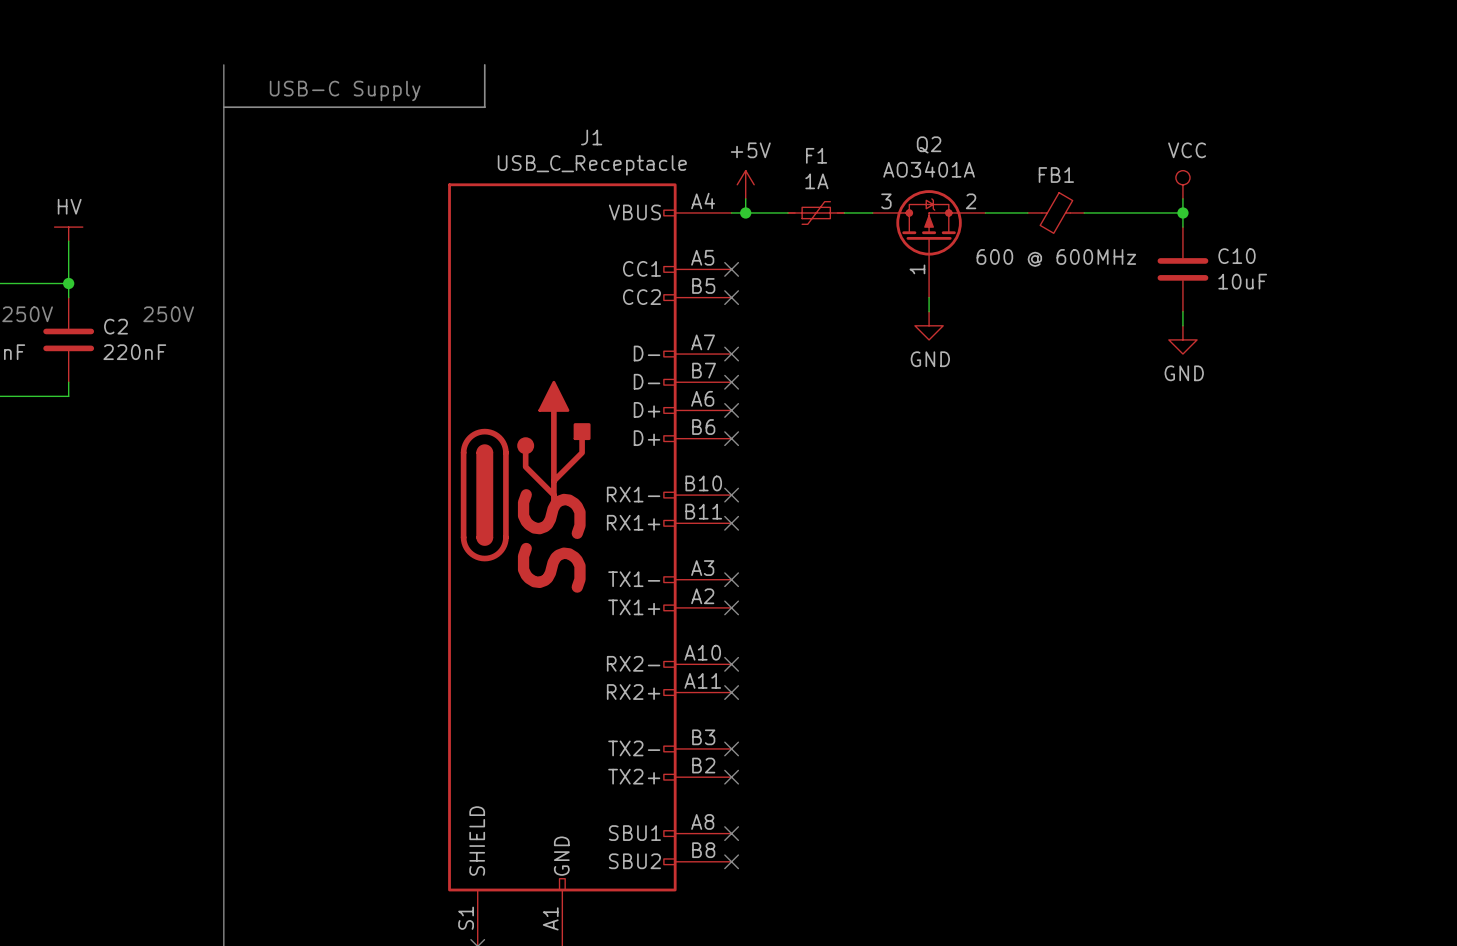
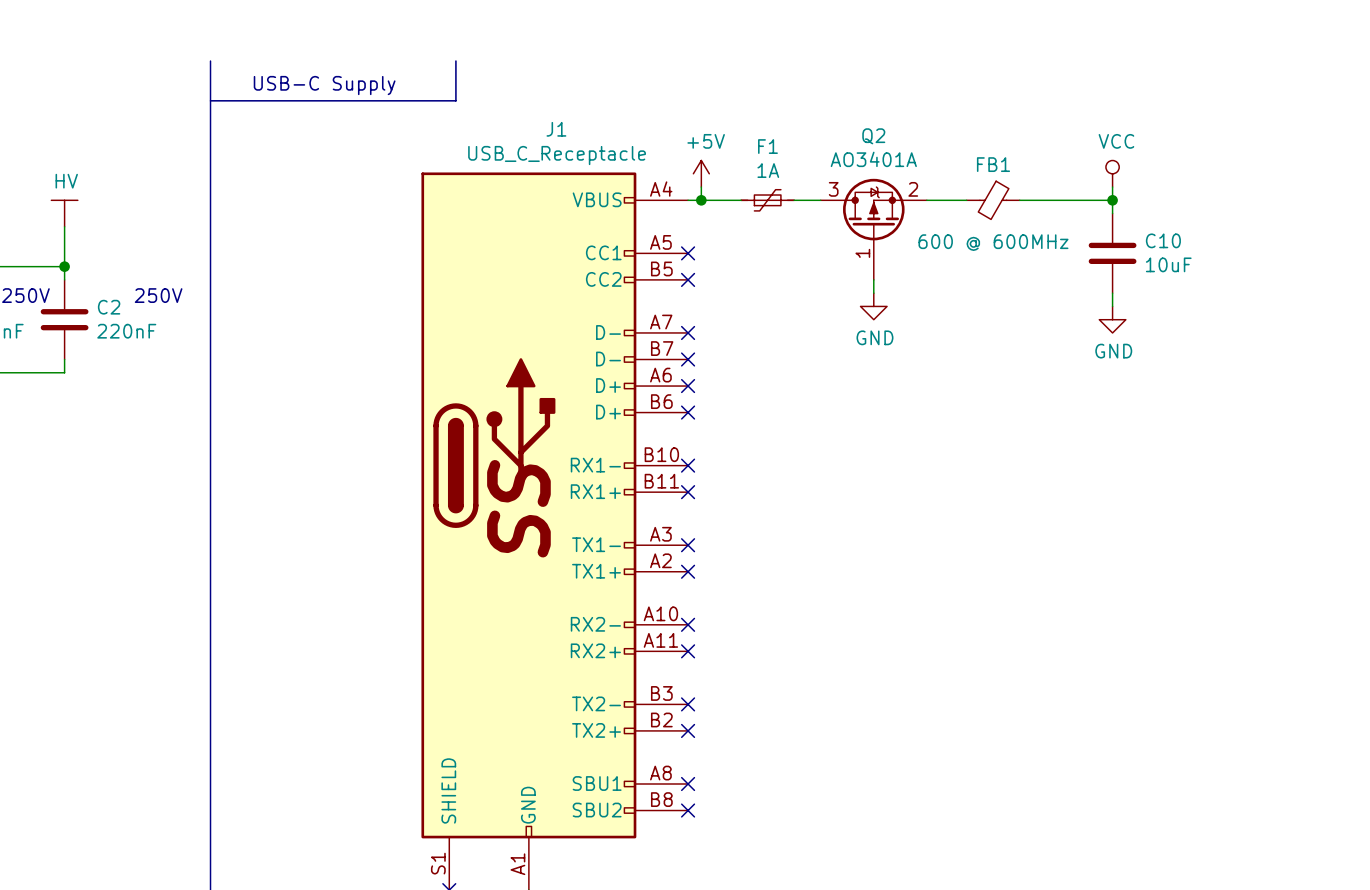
power symbol shape: [54, 227, 83, 242] -> [51, 200, 78, 227]

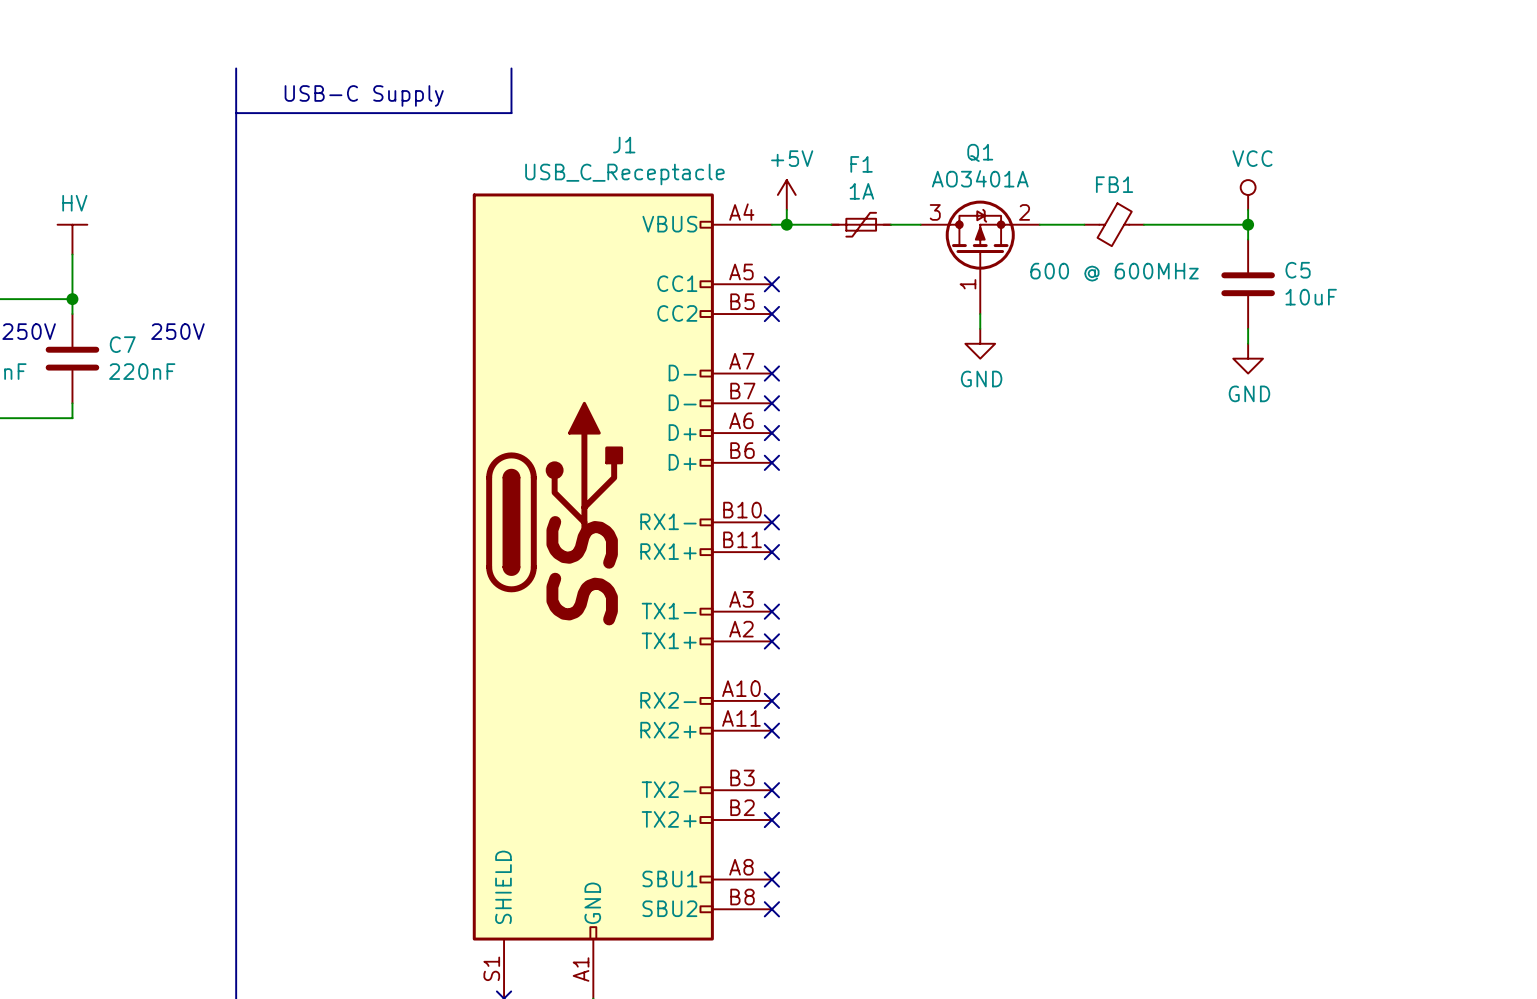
Q2 name: Q2 (873, 136) -> Q1 (980, 152)
C10 name: C10 (1163, 240) -> C5 (1298, 270)
C2 name: C2 (109, 307) -> C7 (122, 344)

